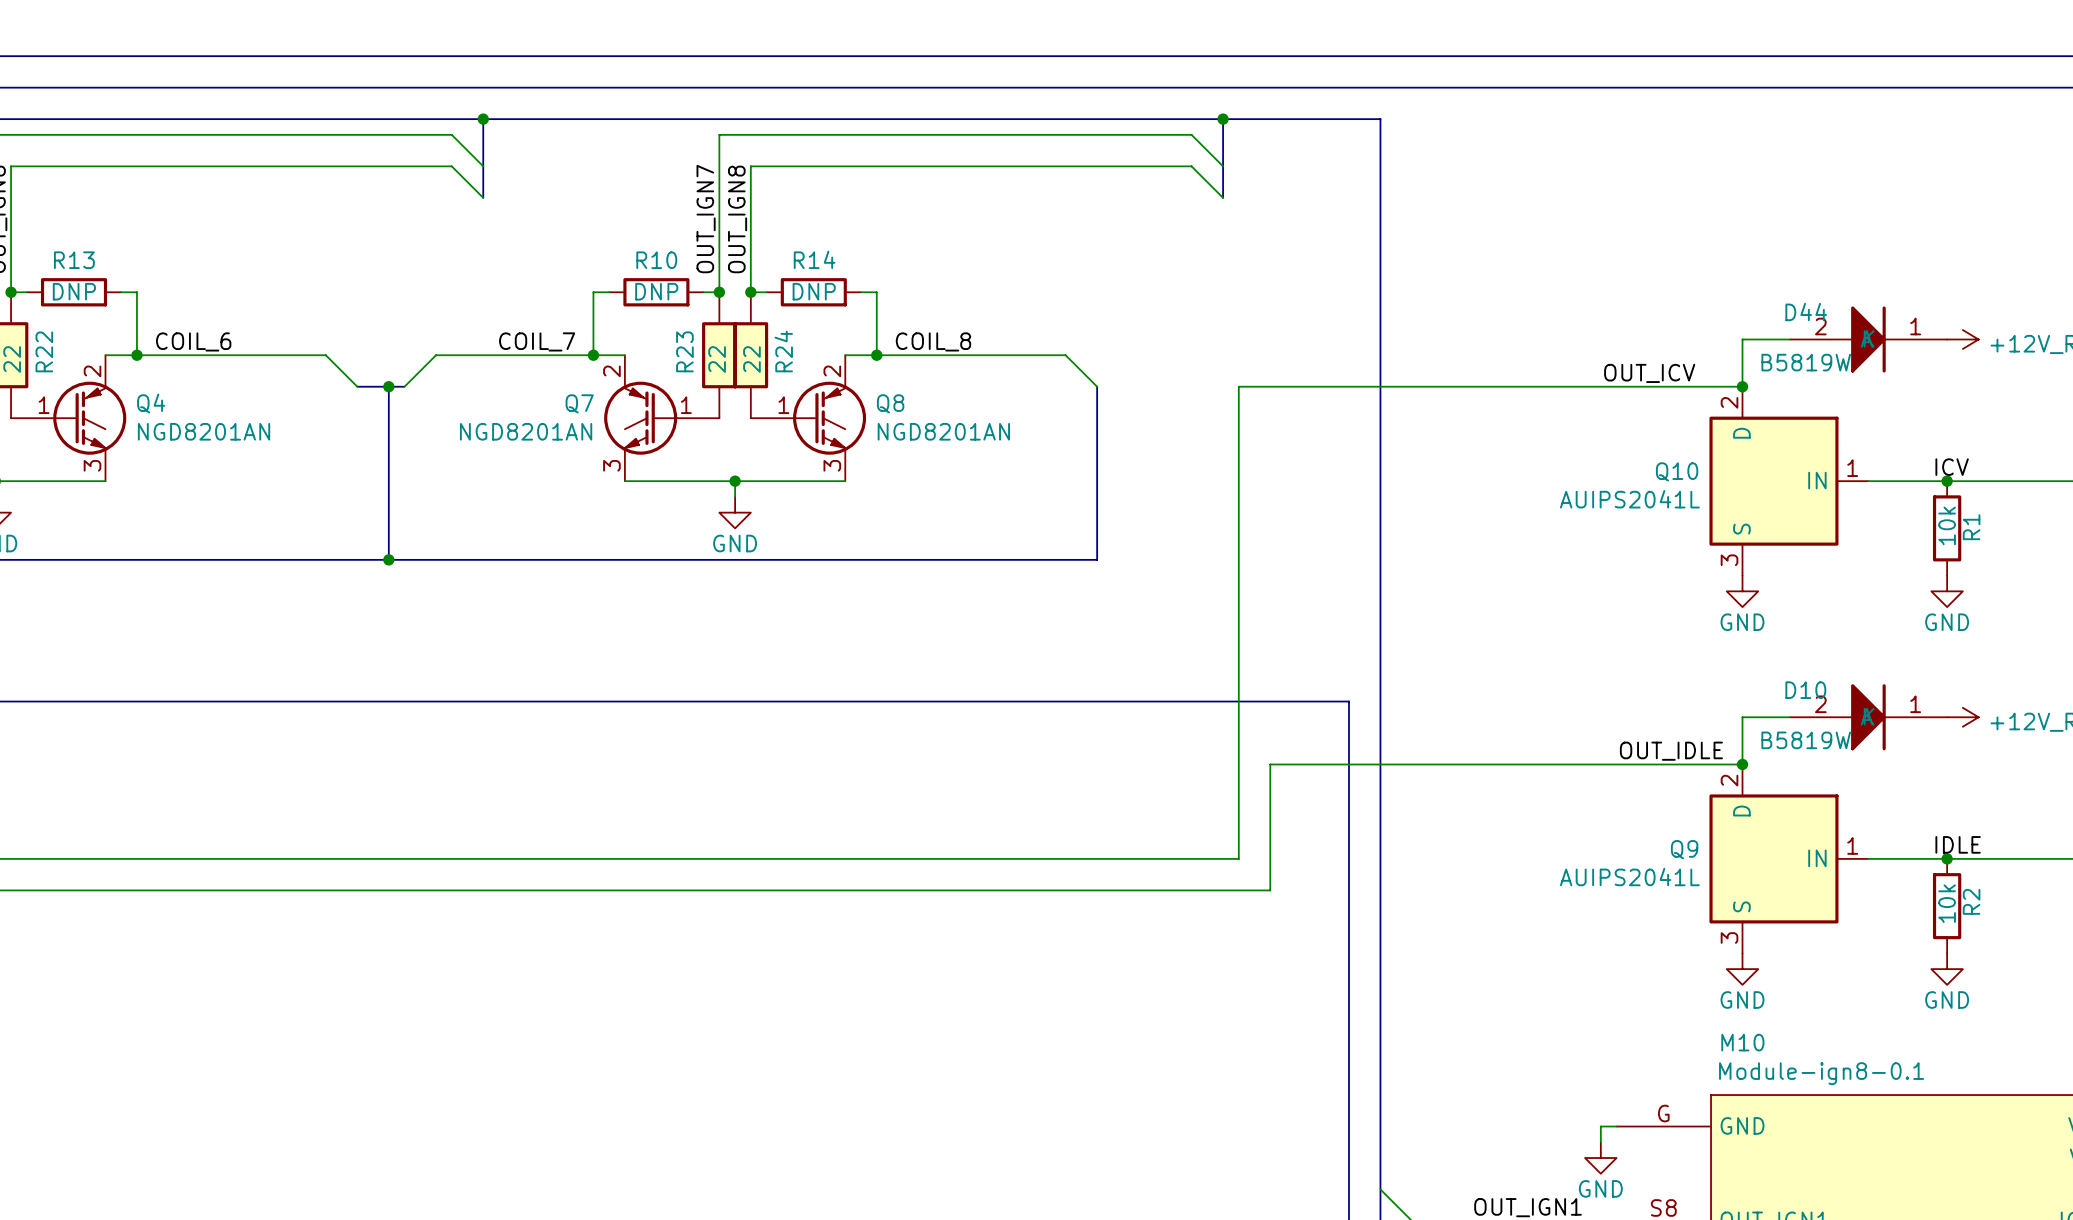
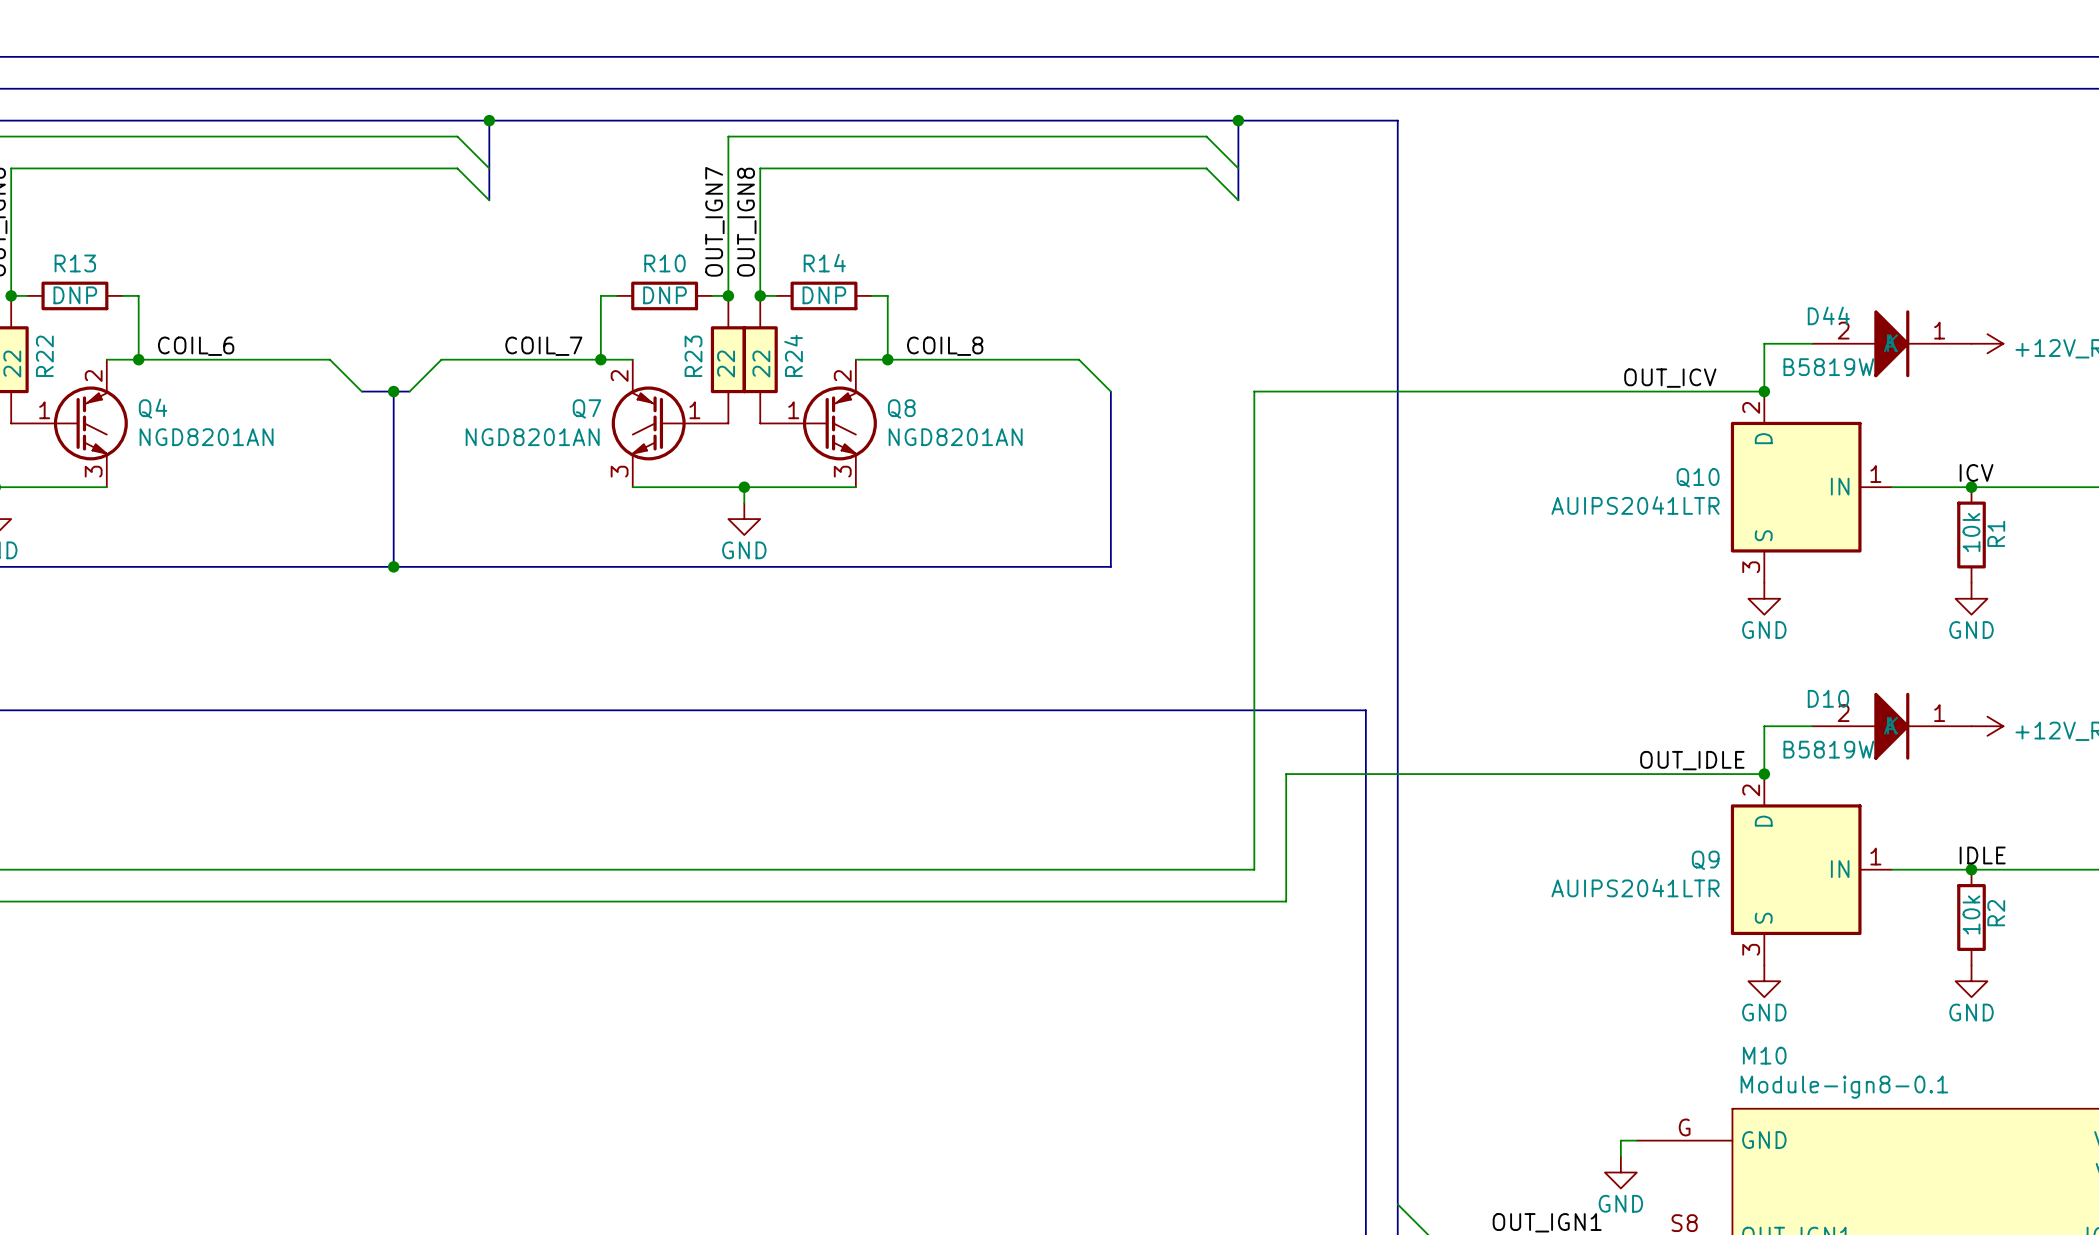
Q10 value: AUIPS2041L (1629, 499) -> AUIPS2041LTR (1635, 505)
Q9 value: AUIPS2041L (1629, 877) -> AUIPS2041LTR (1635, 888)

